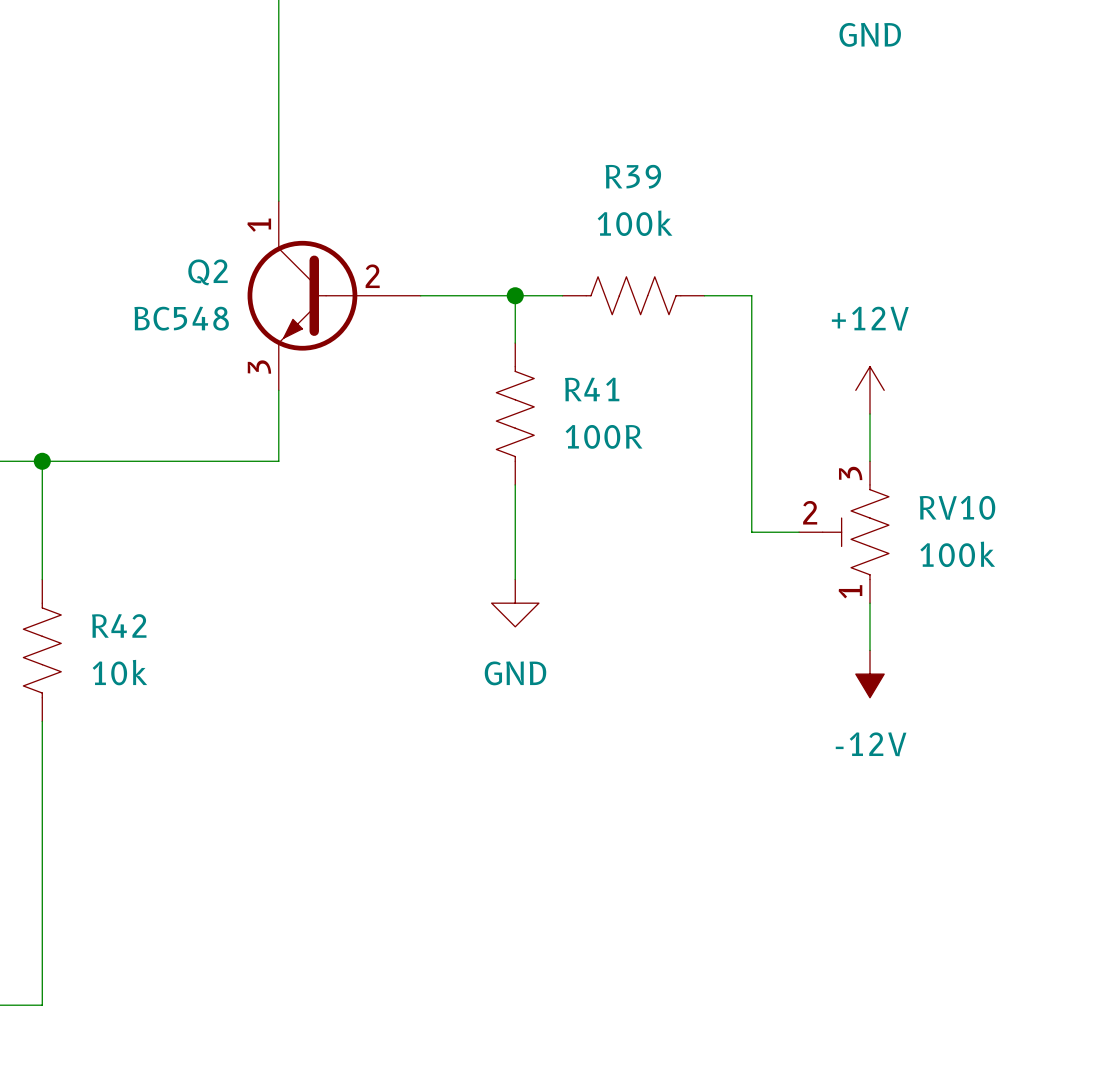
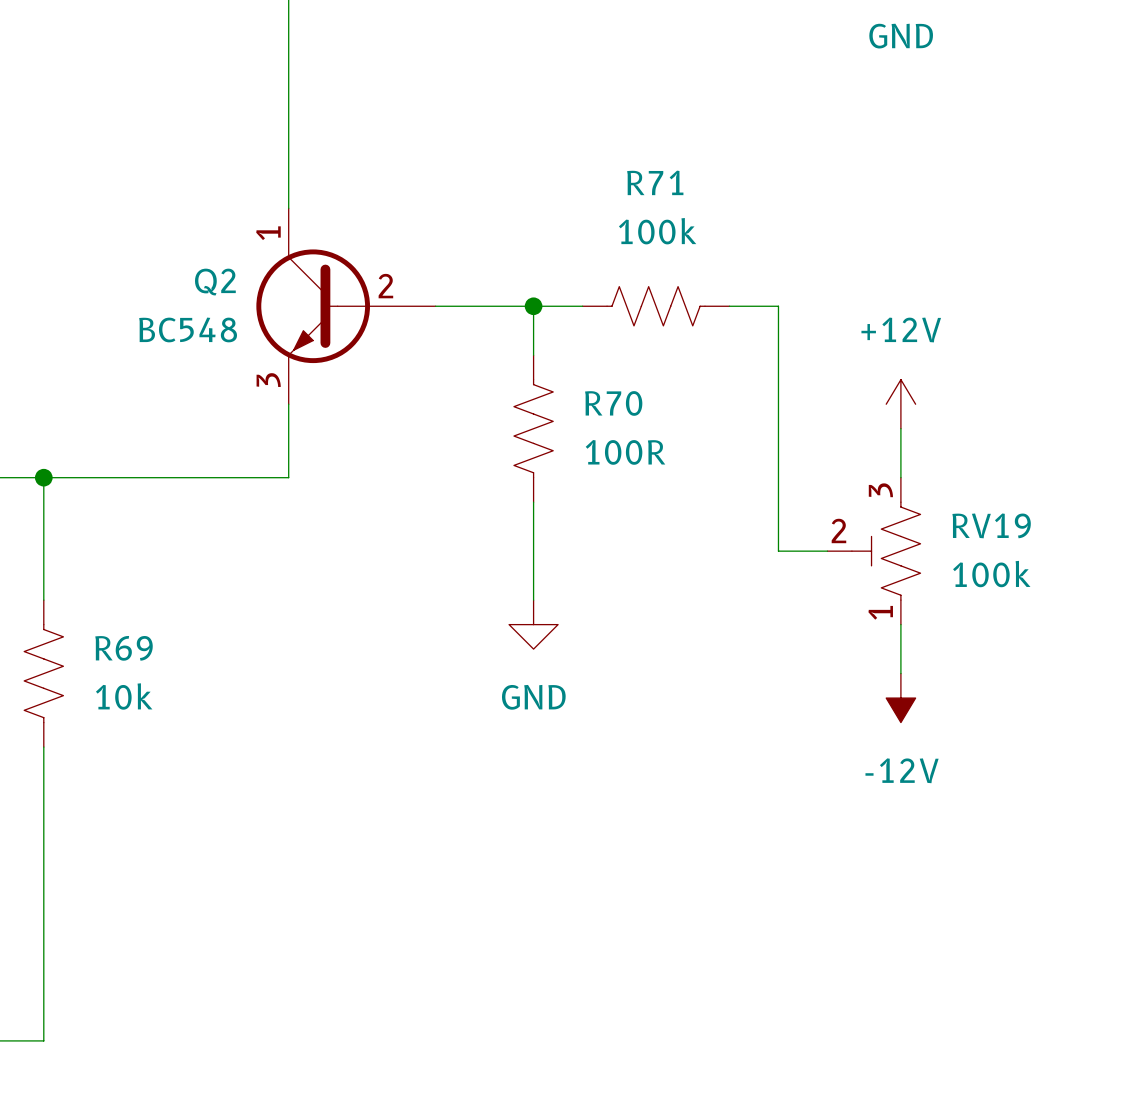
R39 name: R39 (633, 176) -> R71 (655, 182)
R41 name: R41 (592, 389) -> R70 (613, 403)
RV10 name: RV10 (957, 507) -> RV19 (991, 525)
R42 name: R42 (119, 625) -> R69 (124, 648)

